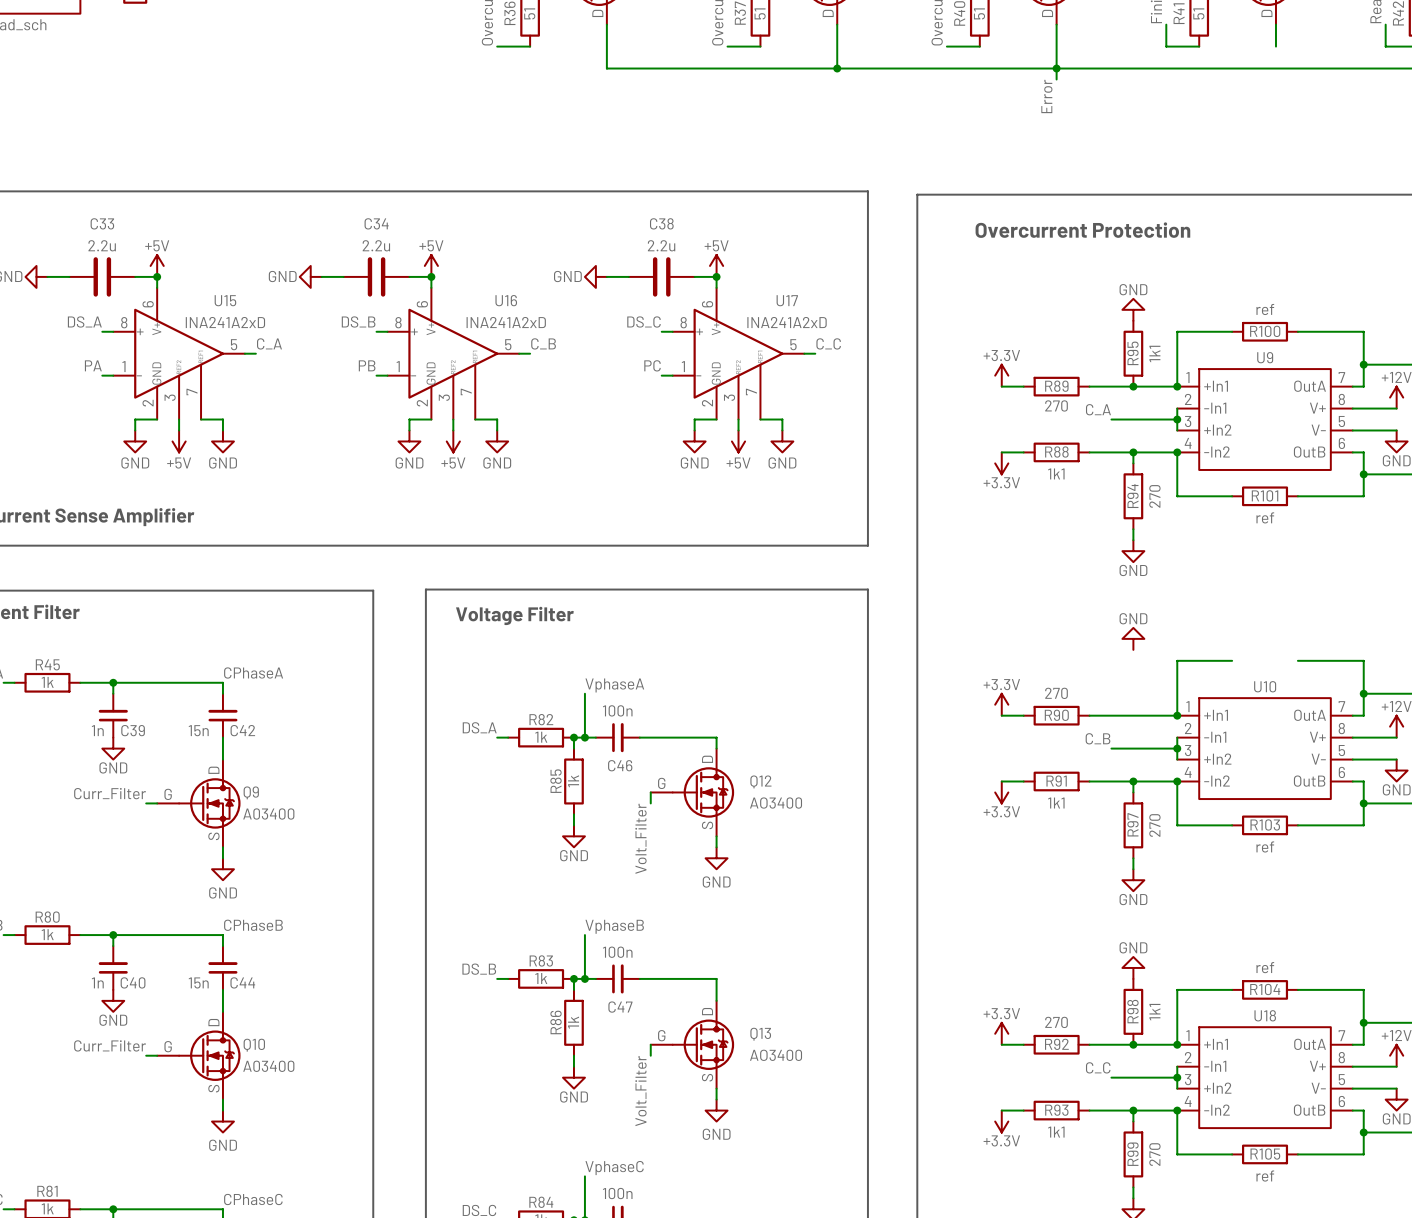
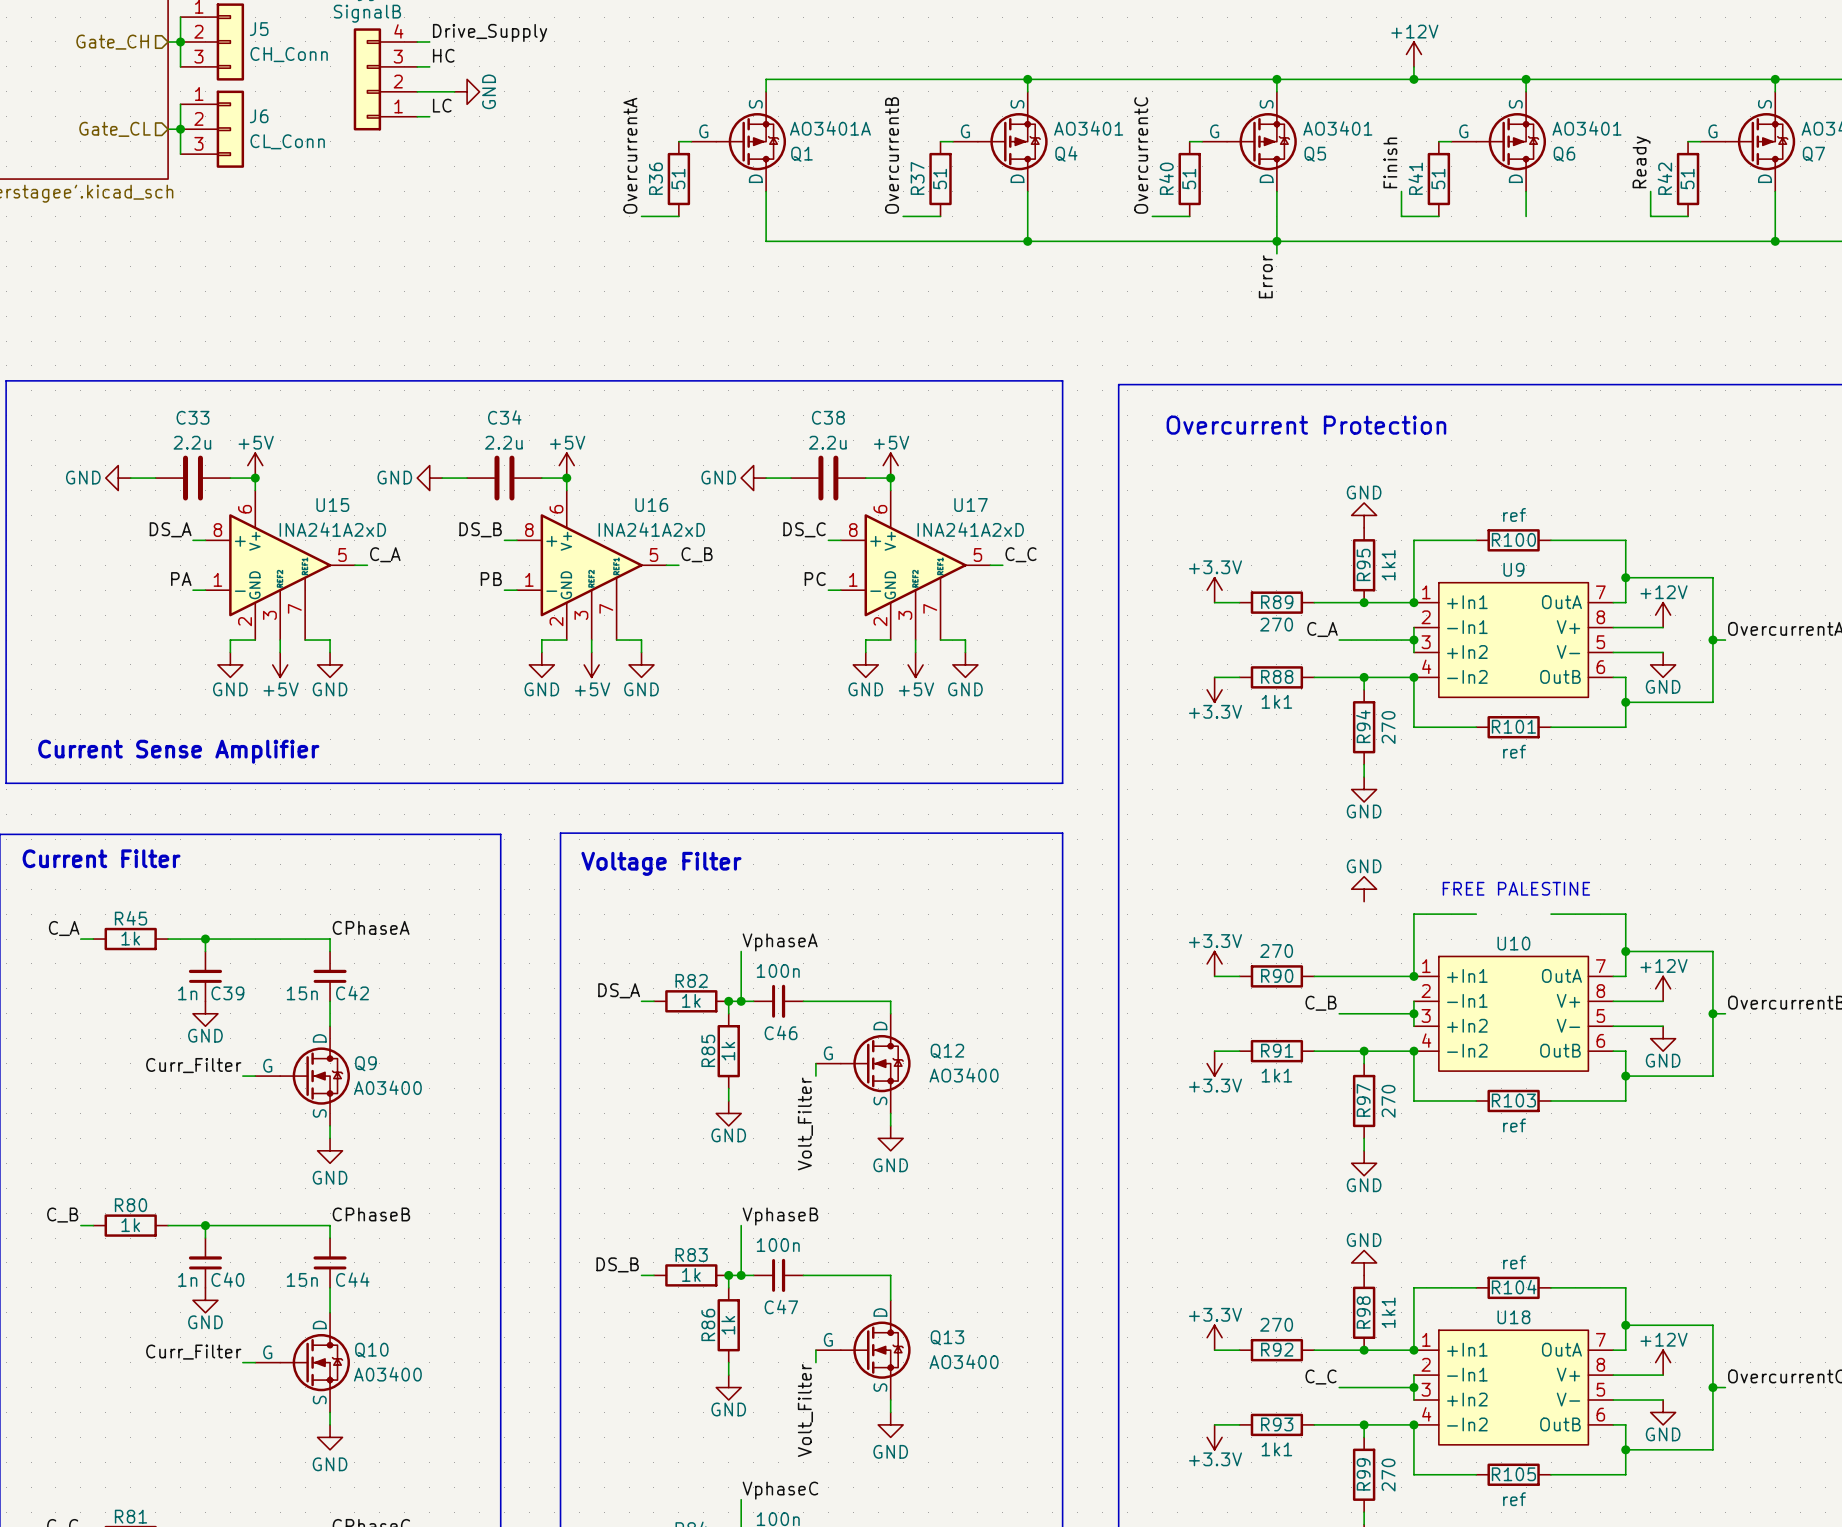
text: none -> FREE PALESTINE (1516, 888)

